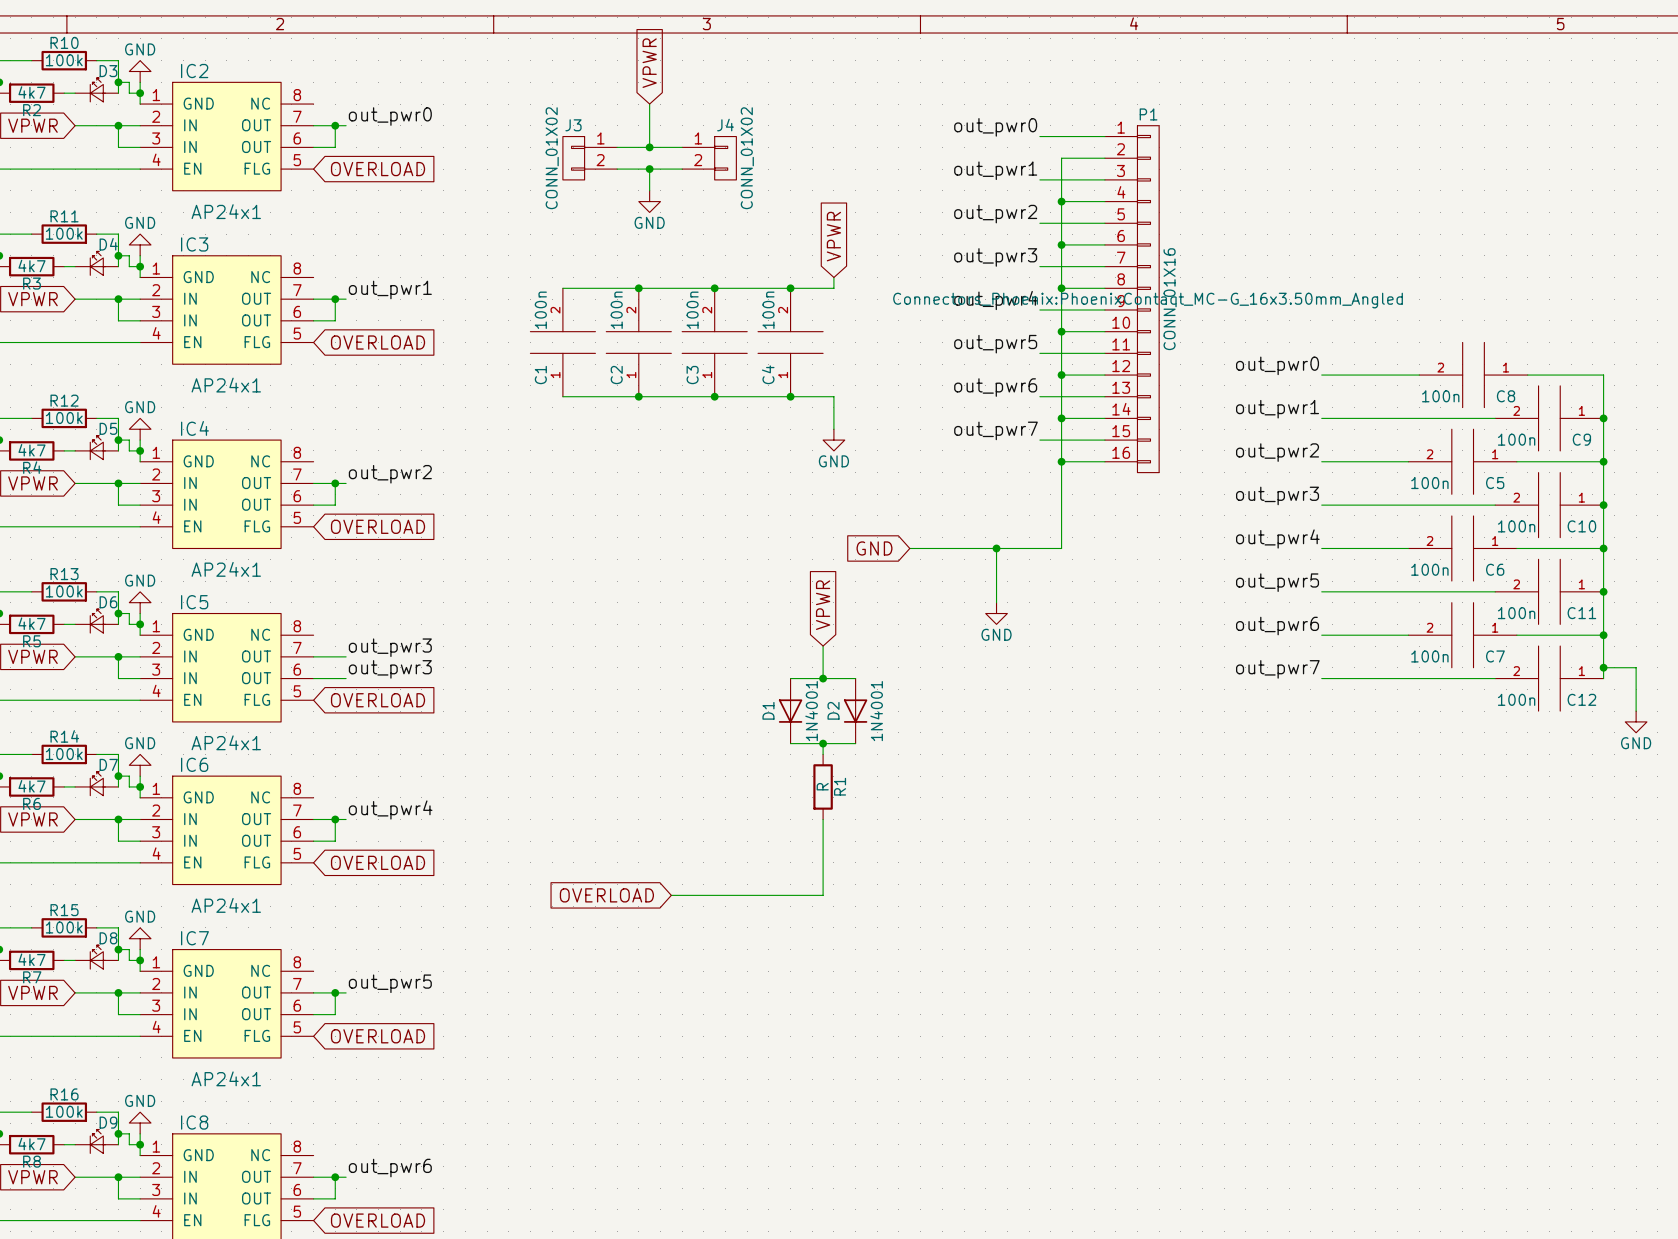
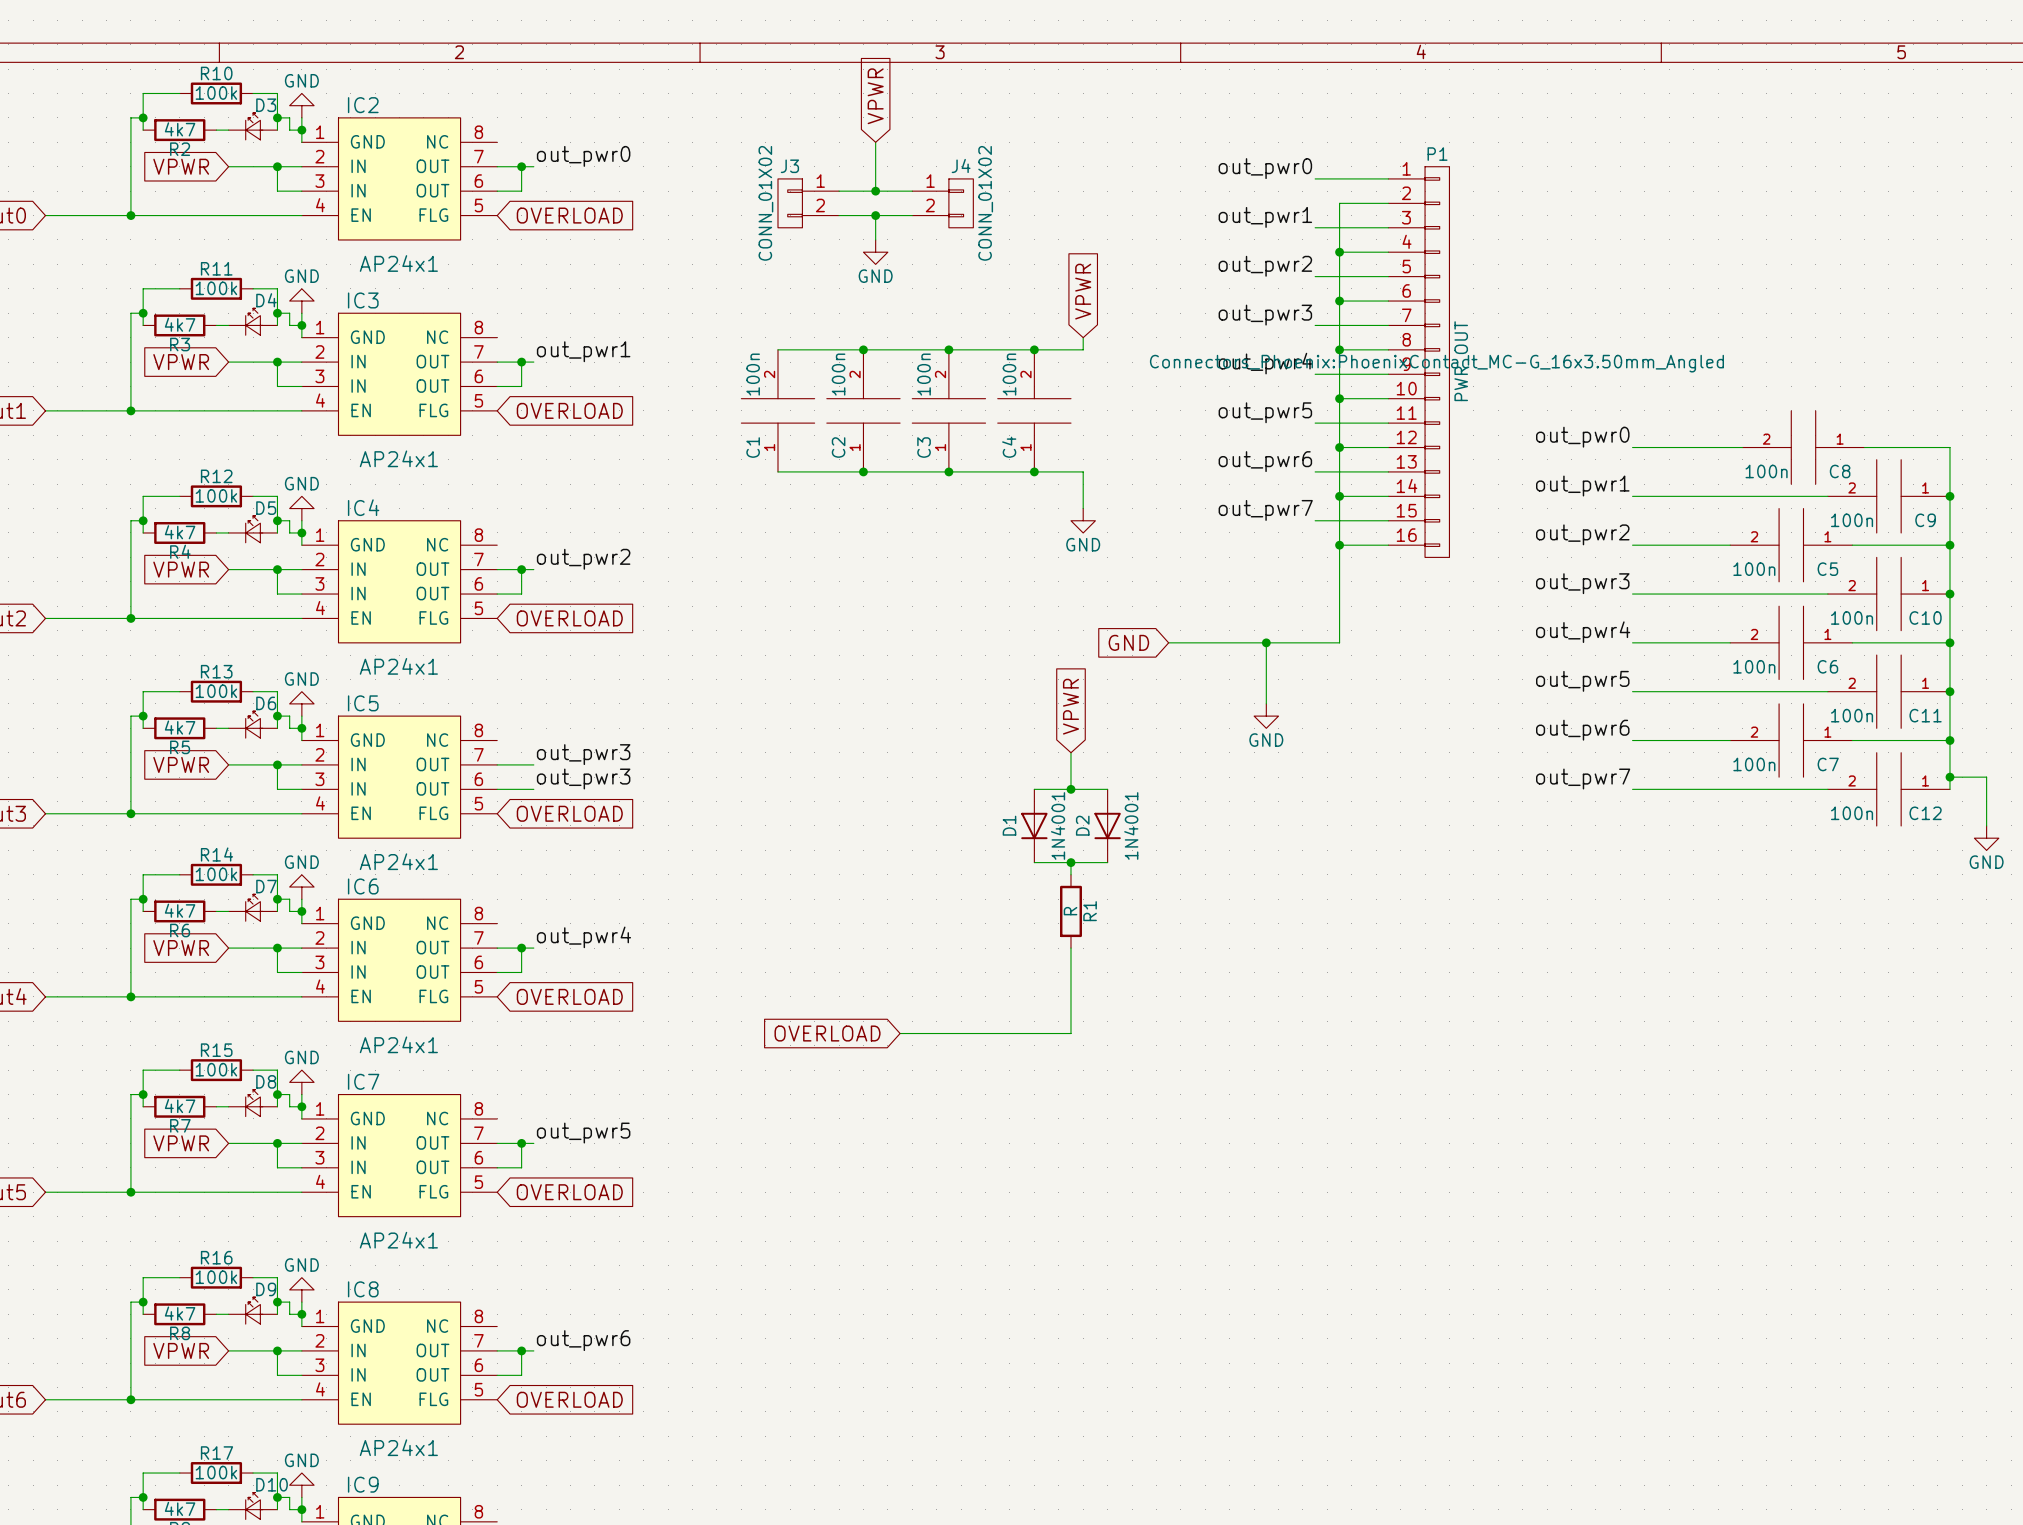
P1 value: CONN_01X16 (1170, 299) -> PWR_OUT (1461, 361)

